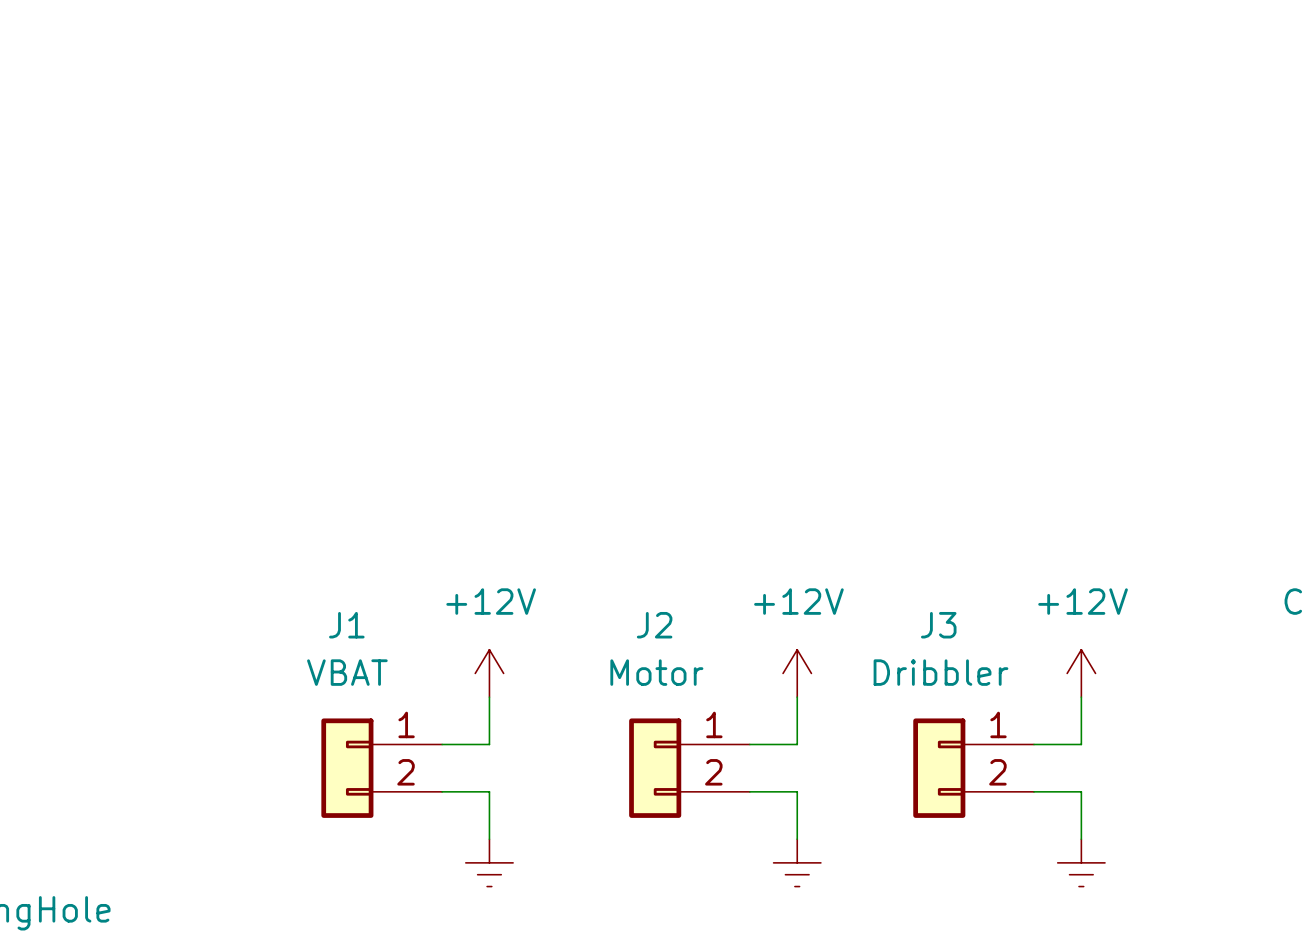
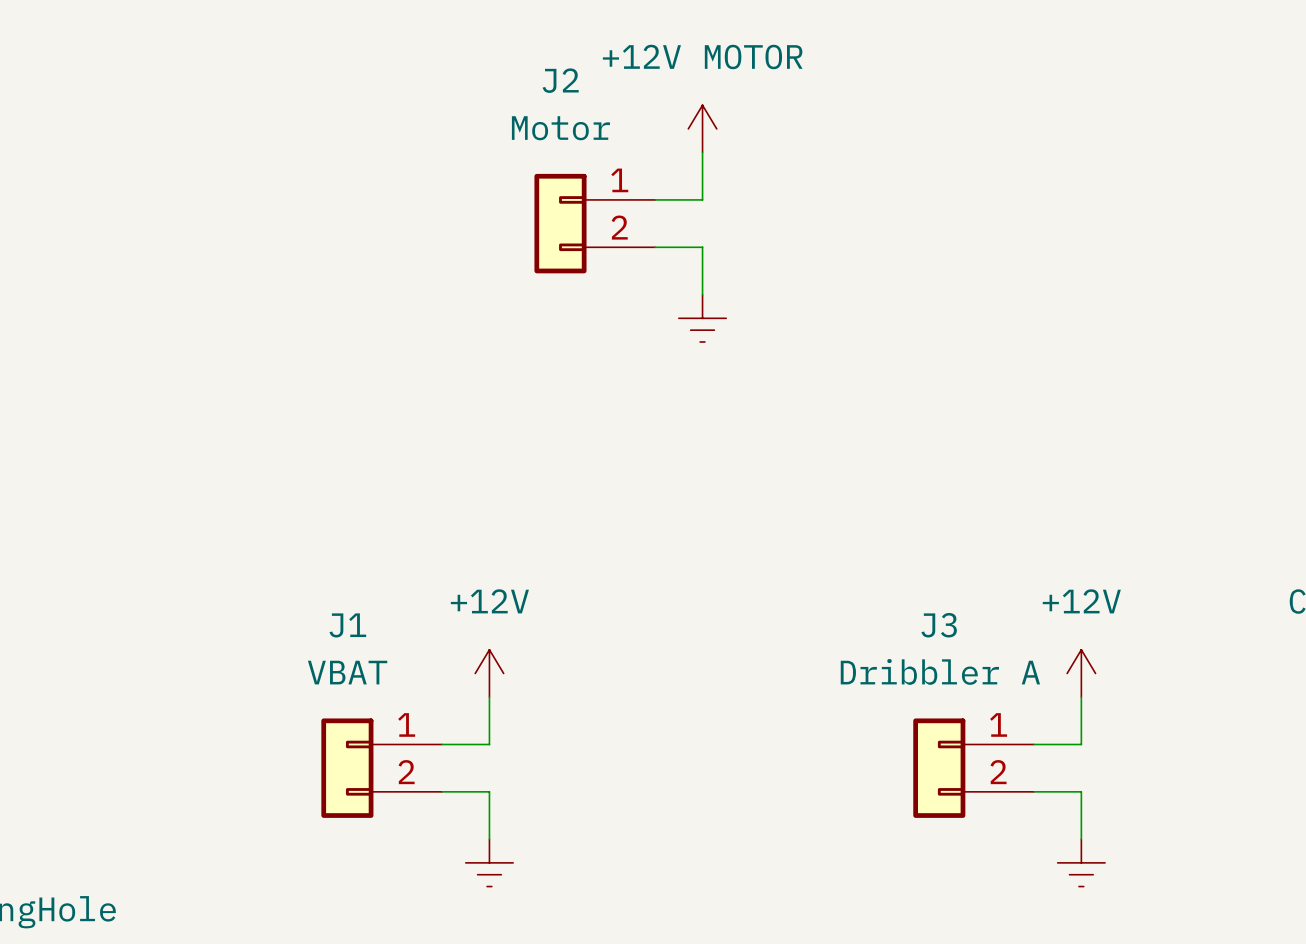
power symbol: none -> +12V MOTOR (702, 128)
wire: none -> (702, 152) (702, 199) (655, 199)
wire: none -> (655, 247) (702, 247) (702, 294)
power symbol: none -> (702, 318)
J3 value: Dribbler (940, 672) -> Dribbler A (940, 671)
power symbol: +12V (797, 673) -> none
wire: (797, 697) (797, 744) (749, 744) -> none
J2 position: (689, 768) -> (594, 223)
wire: (749, 791) (797, 791) (797, 839) -> none
power symbol: (797, 862) -> none

